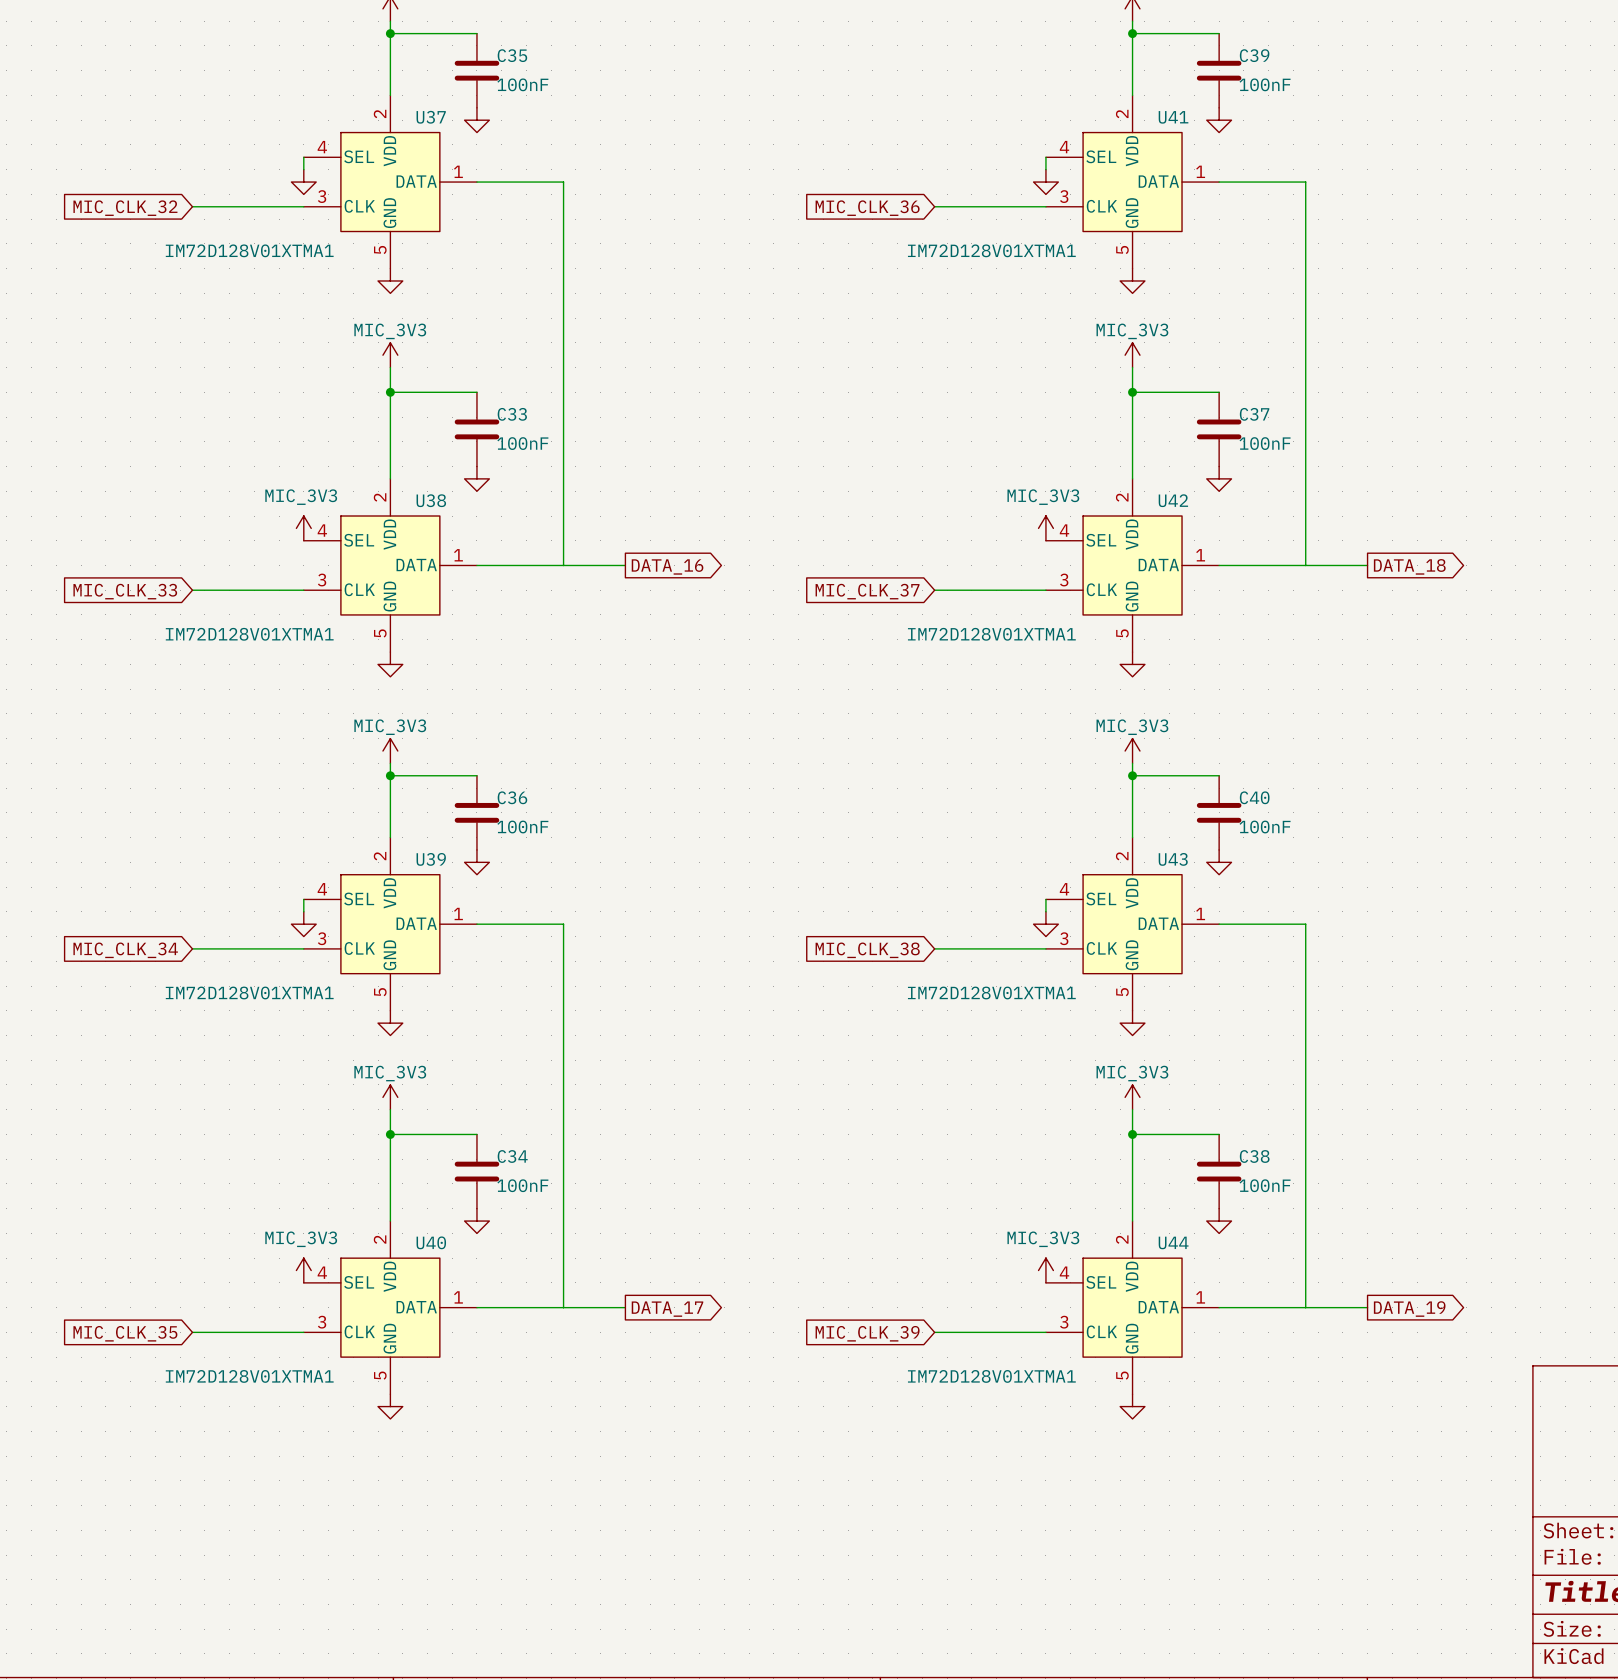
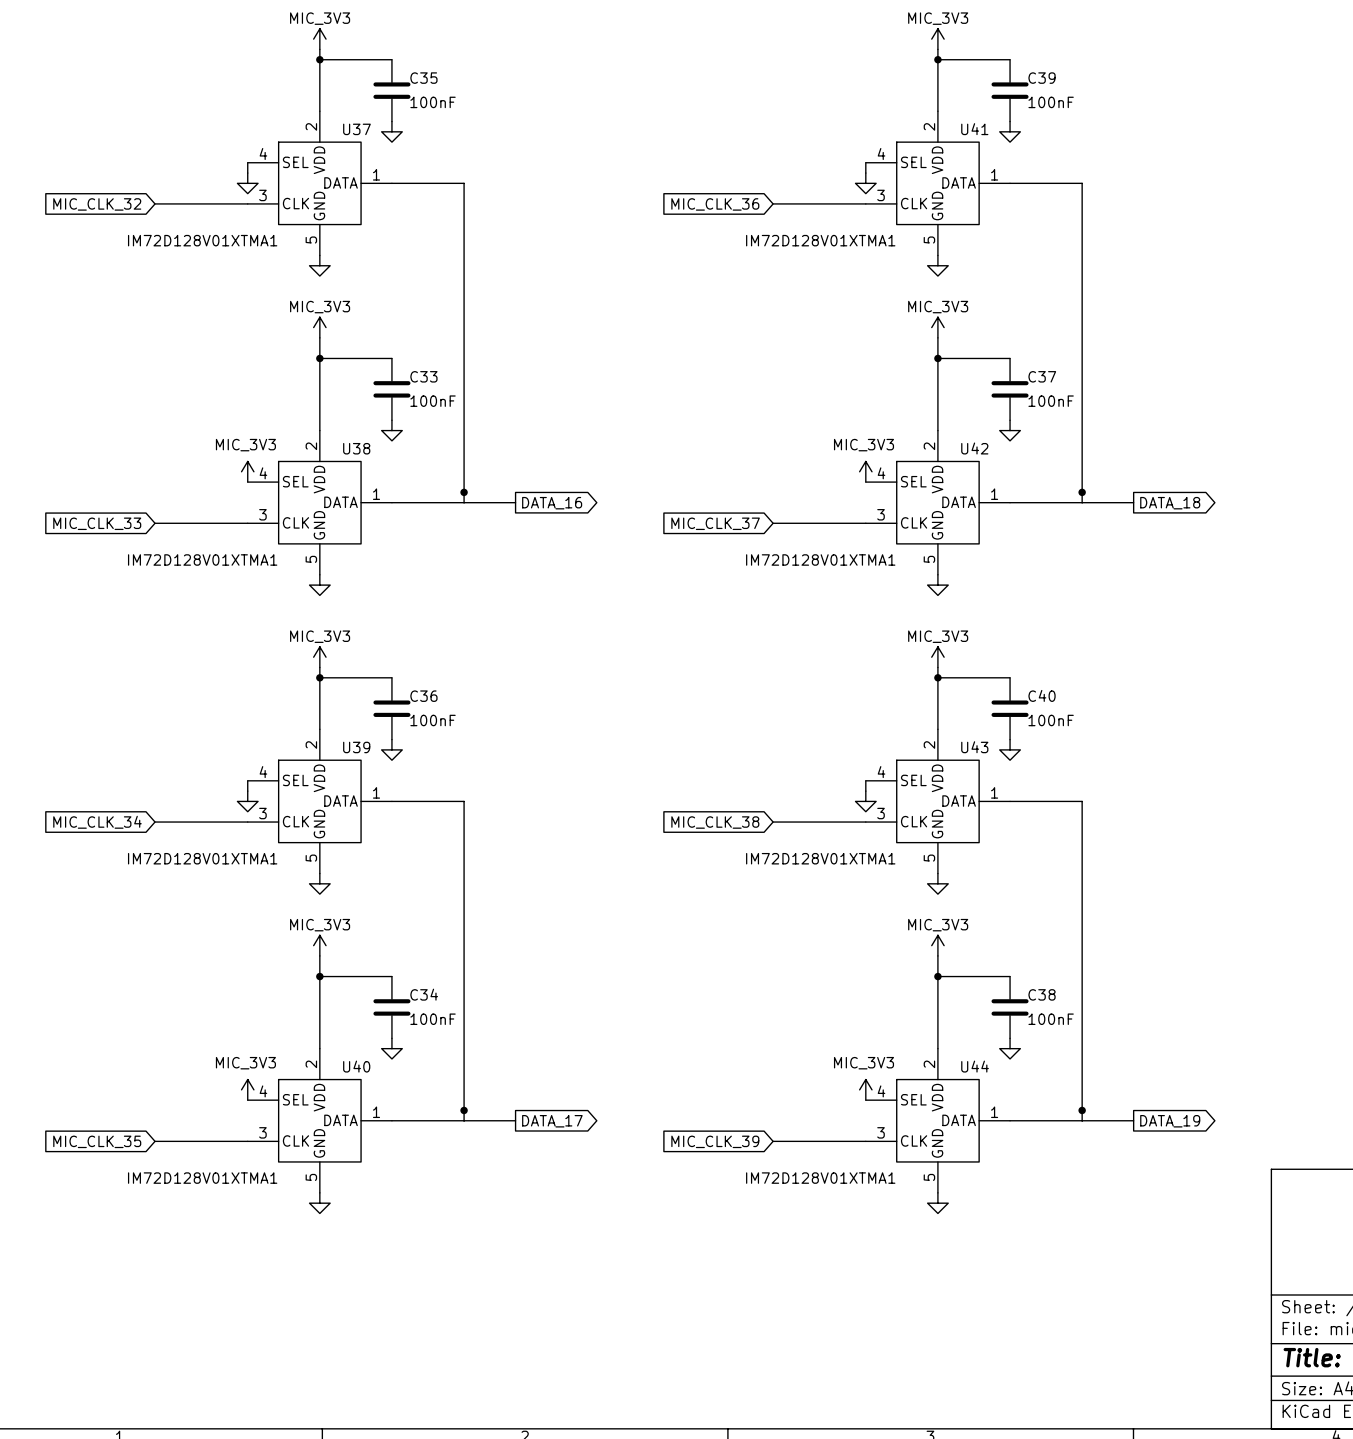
junction: none -> (464, 492)
junction: none -> (1082, 492)
junction: none -> (464, 1110)
junction: none -> (1082, 1110)

